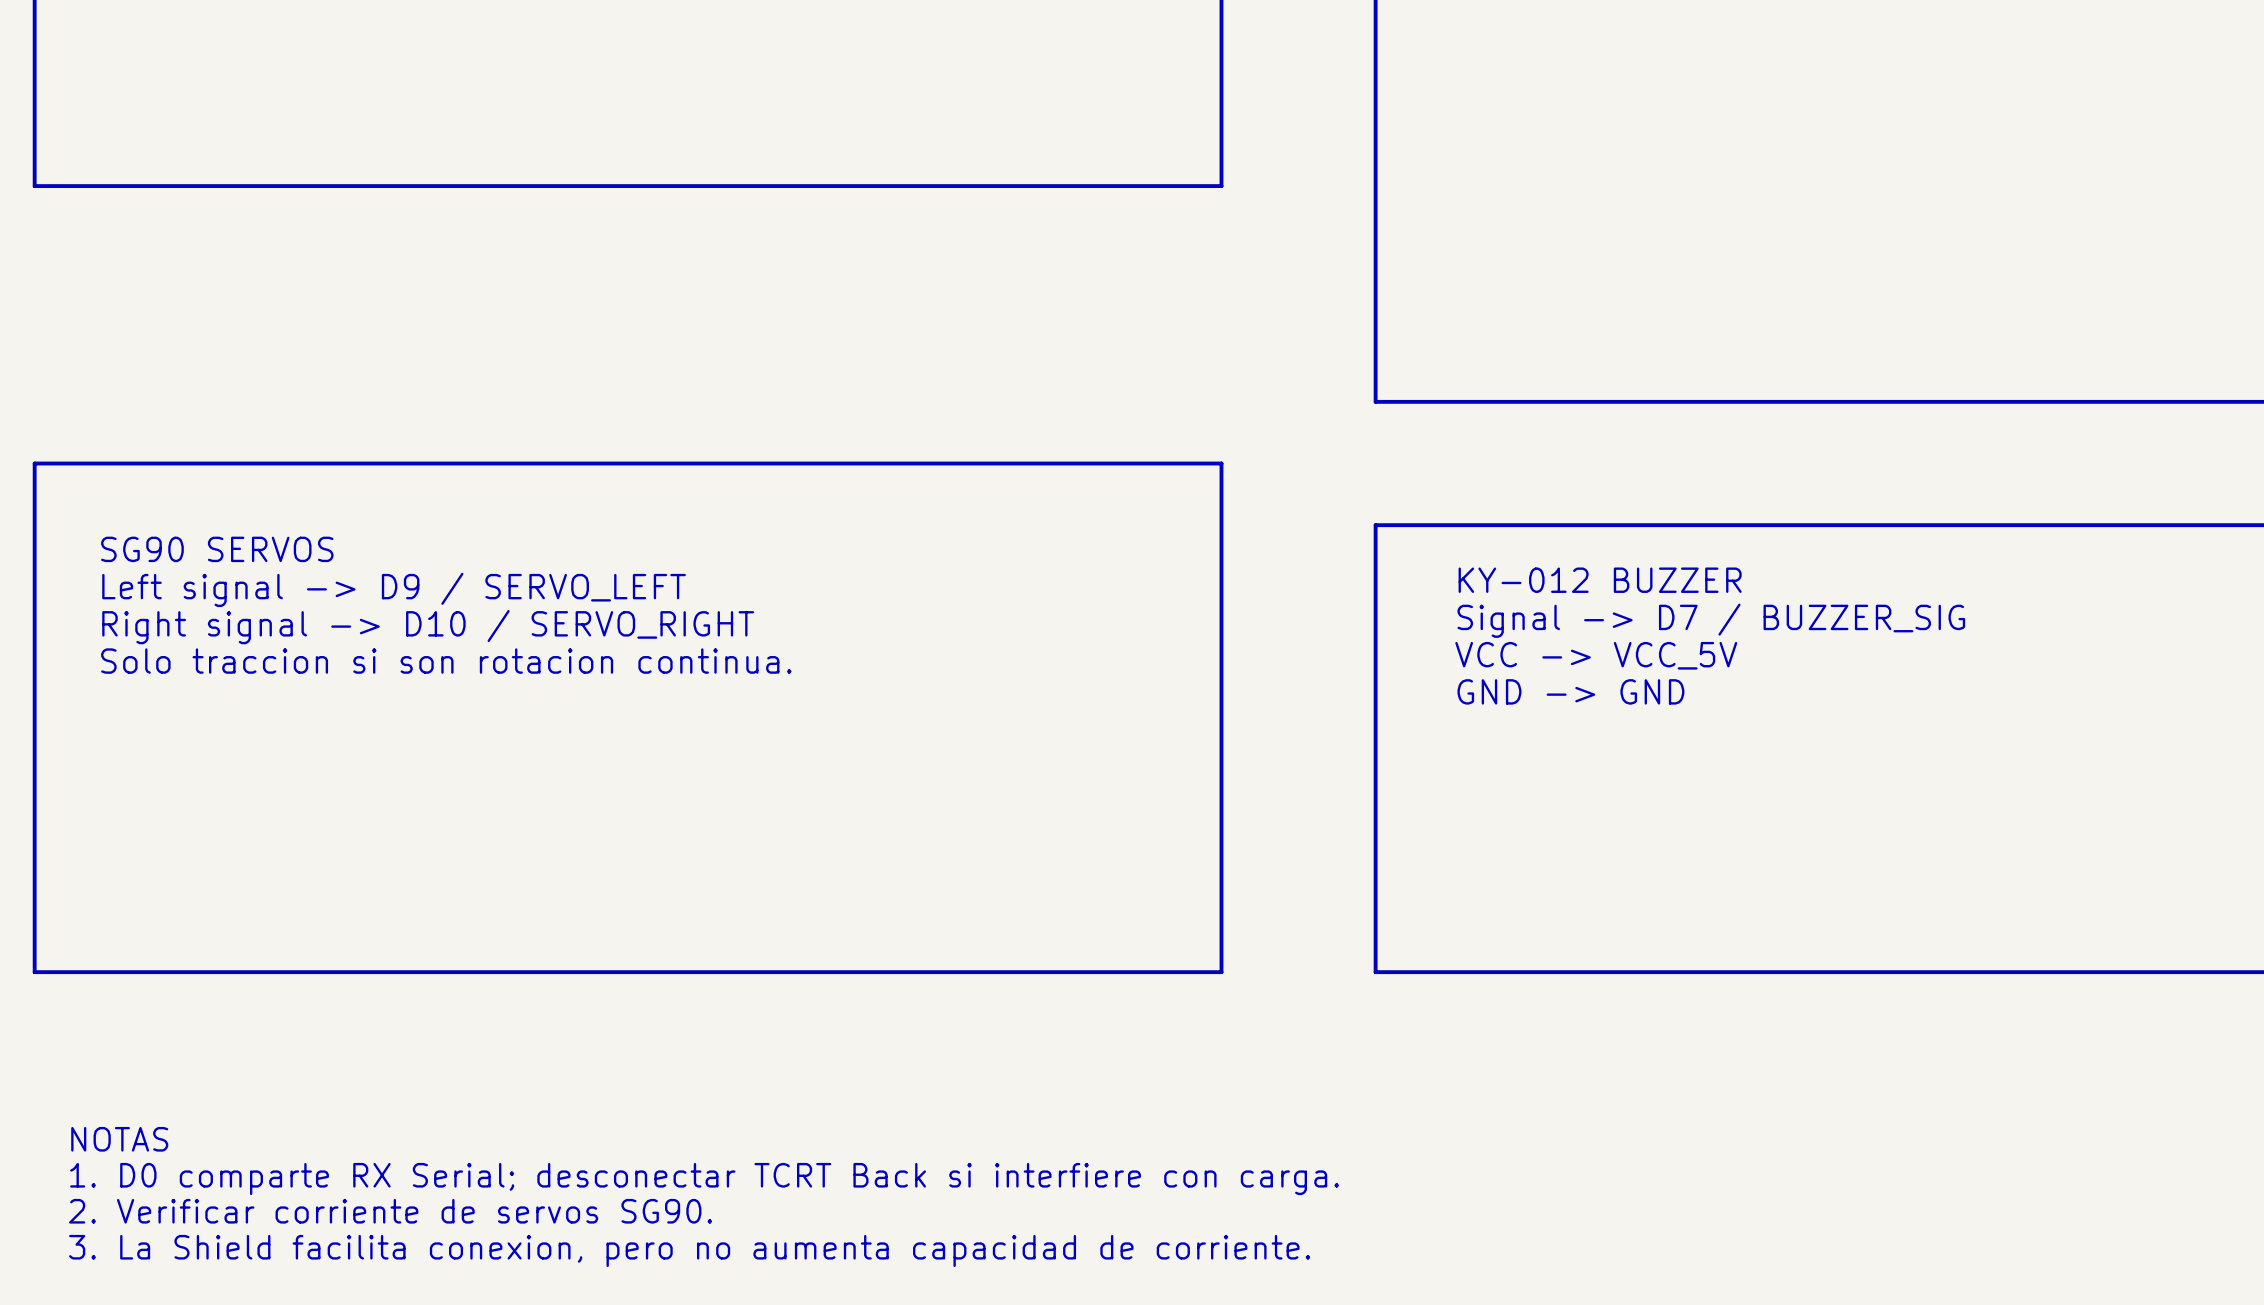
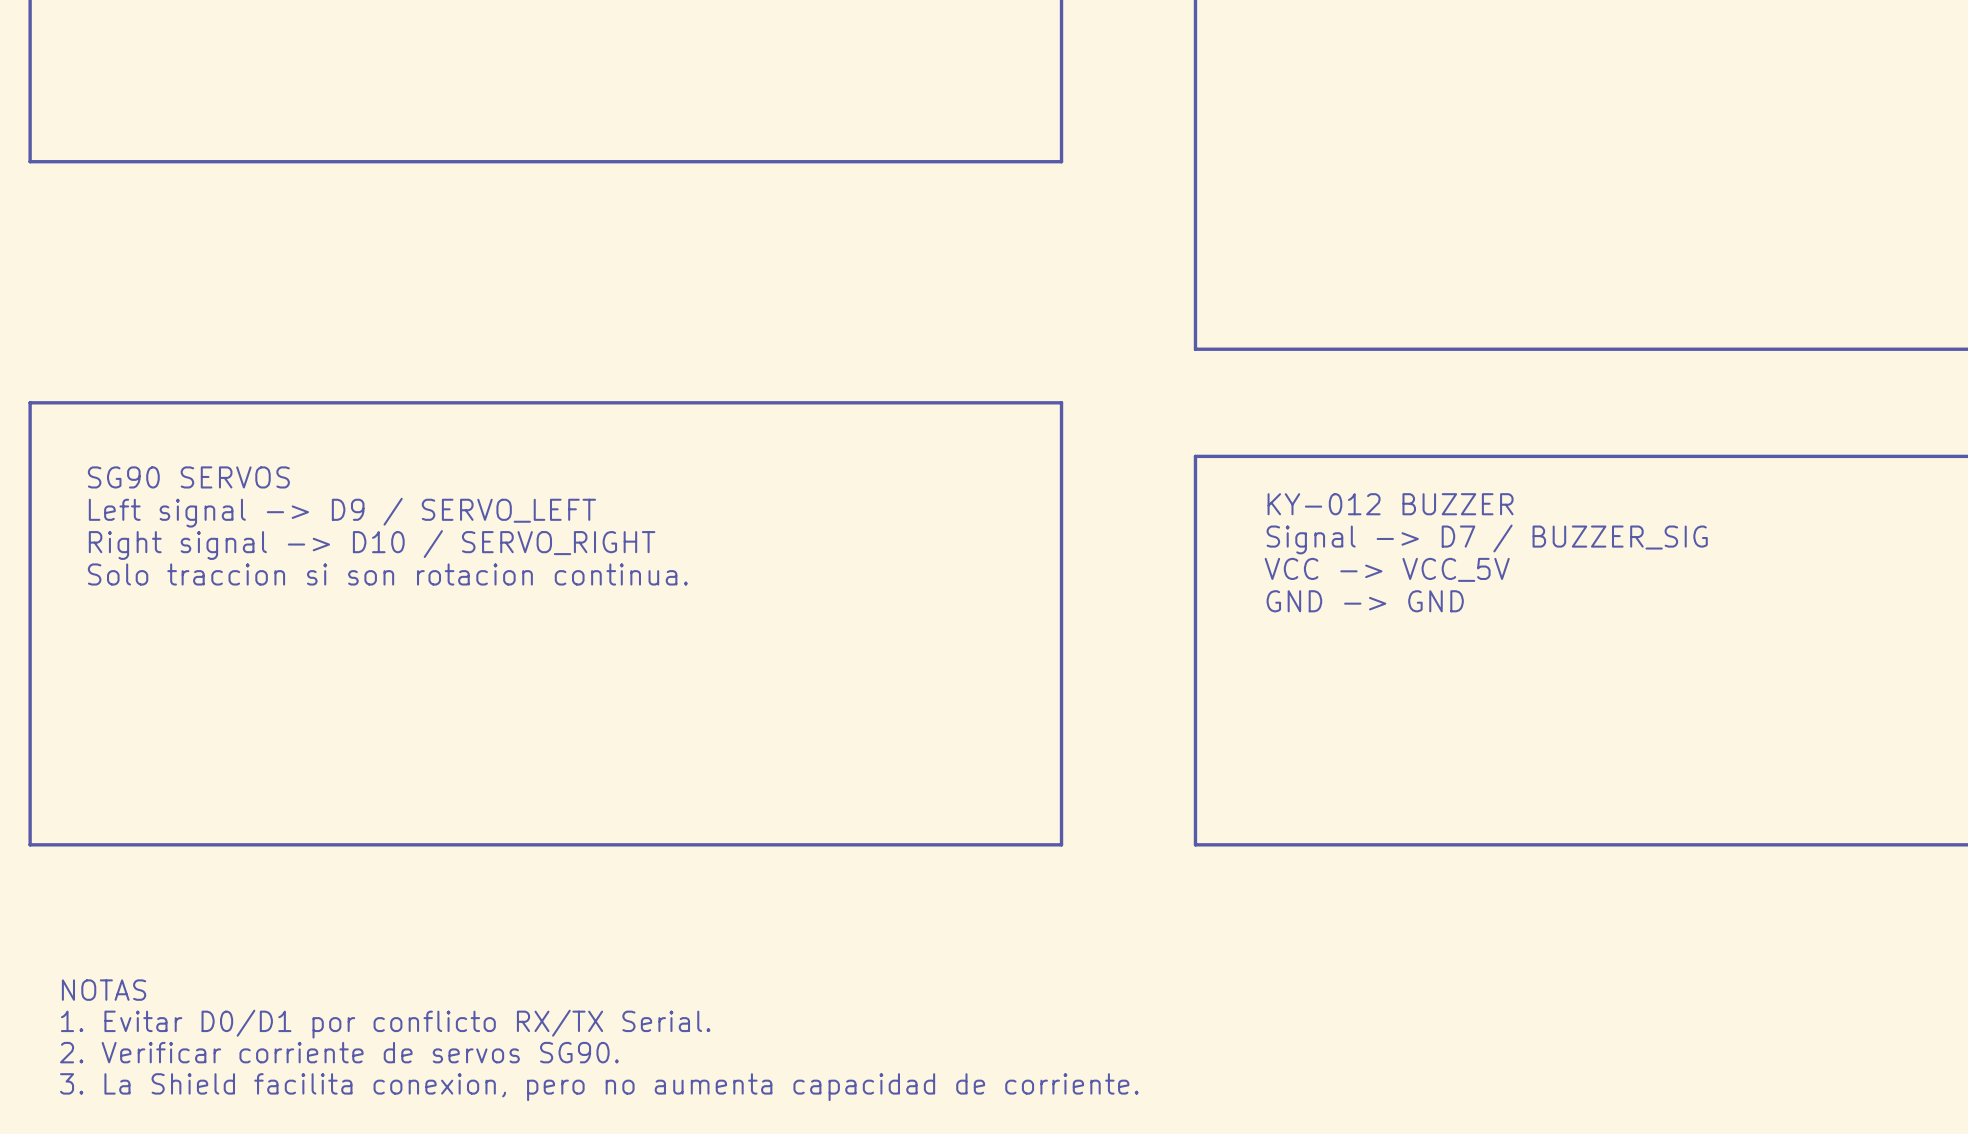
text: 1. D0 comparte RX Serial; desconectar TCRT Back si interfiere con carga. (704, 1179) -> 1. Evitar D0/D1 por conflicto RX/TX Serial. (385, 1024)

